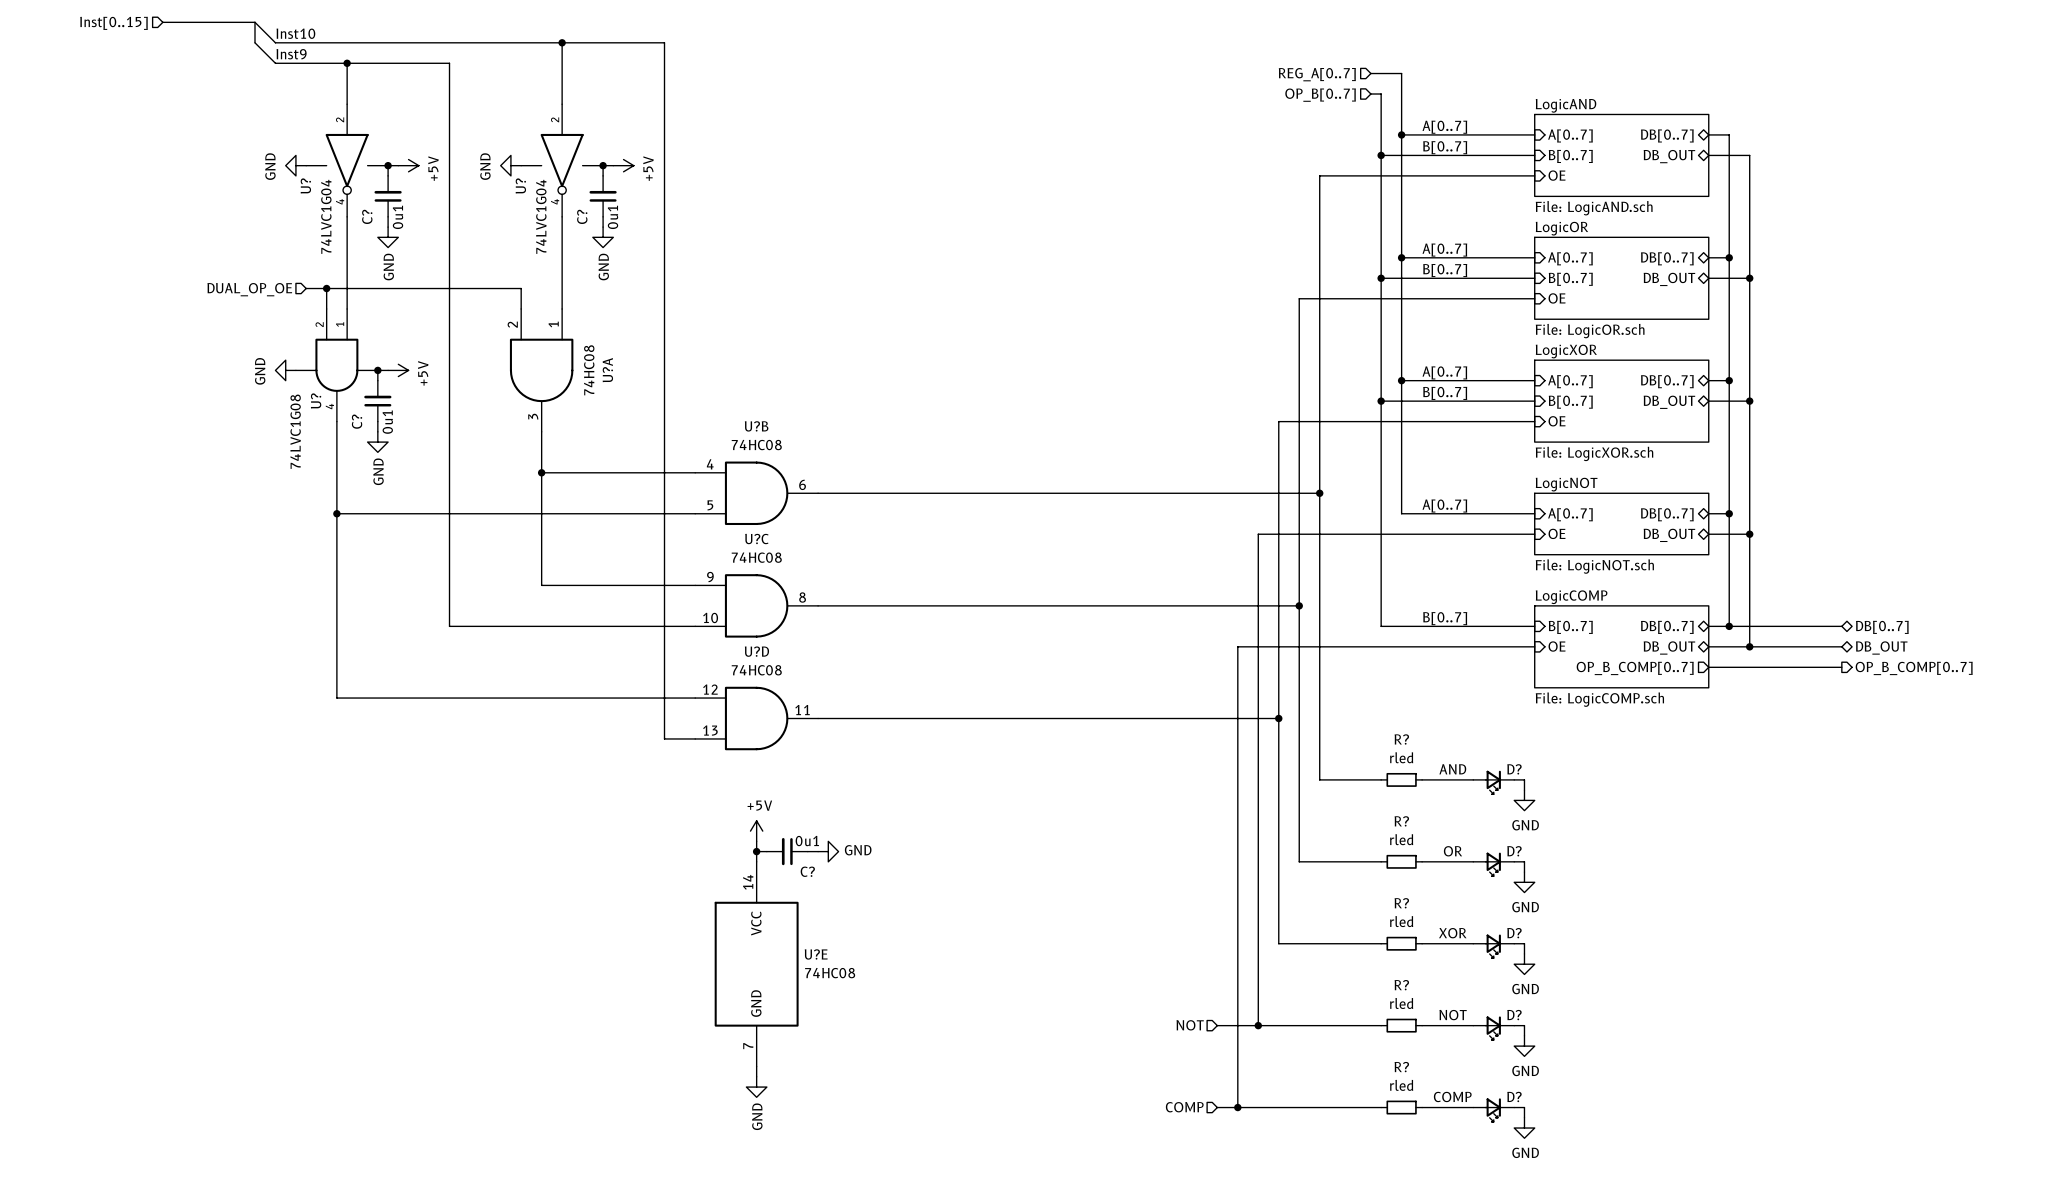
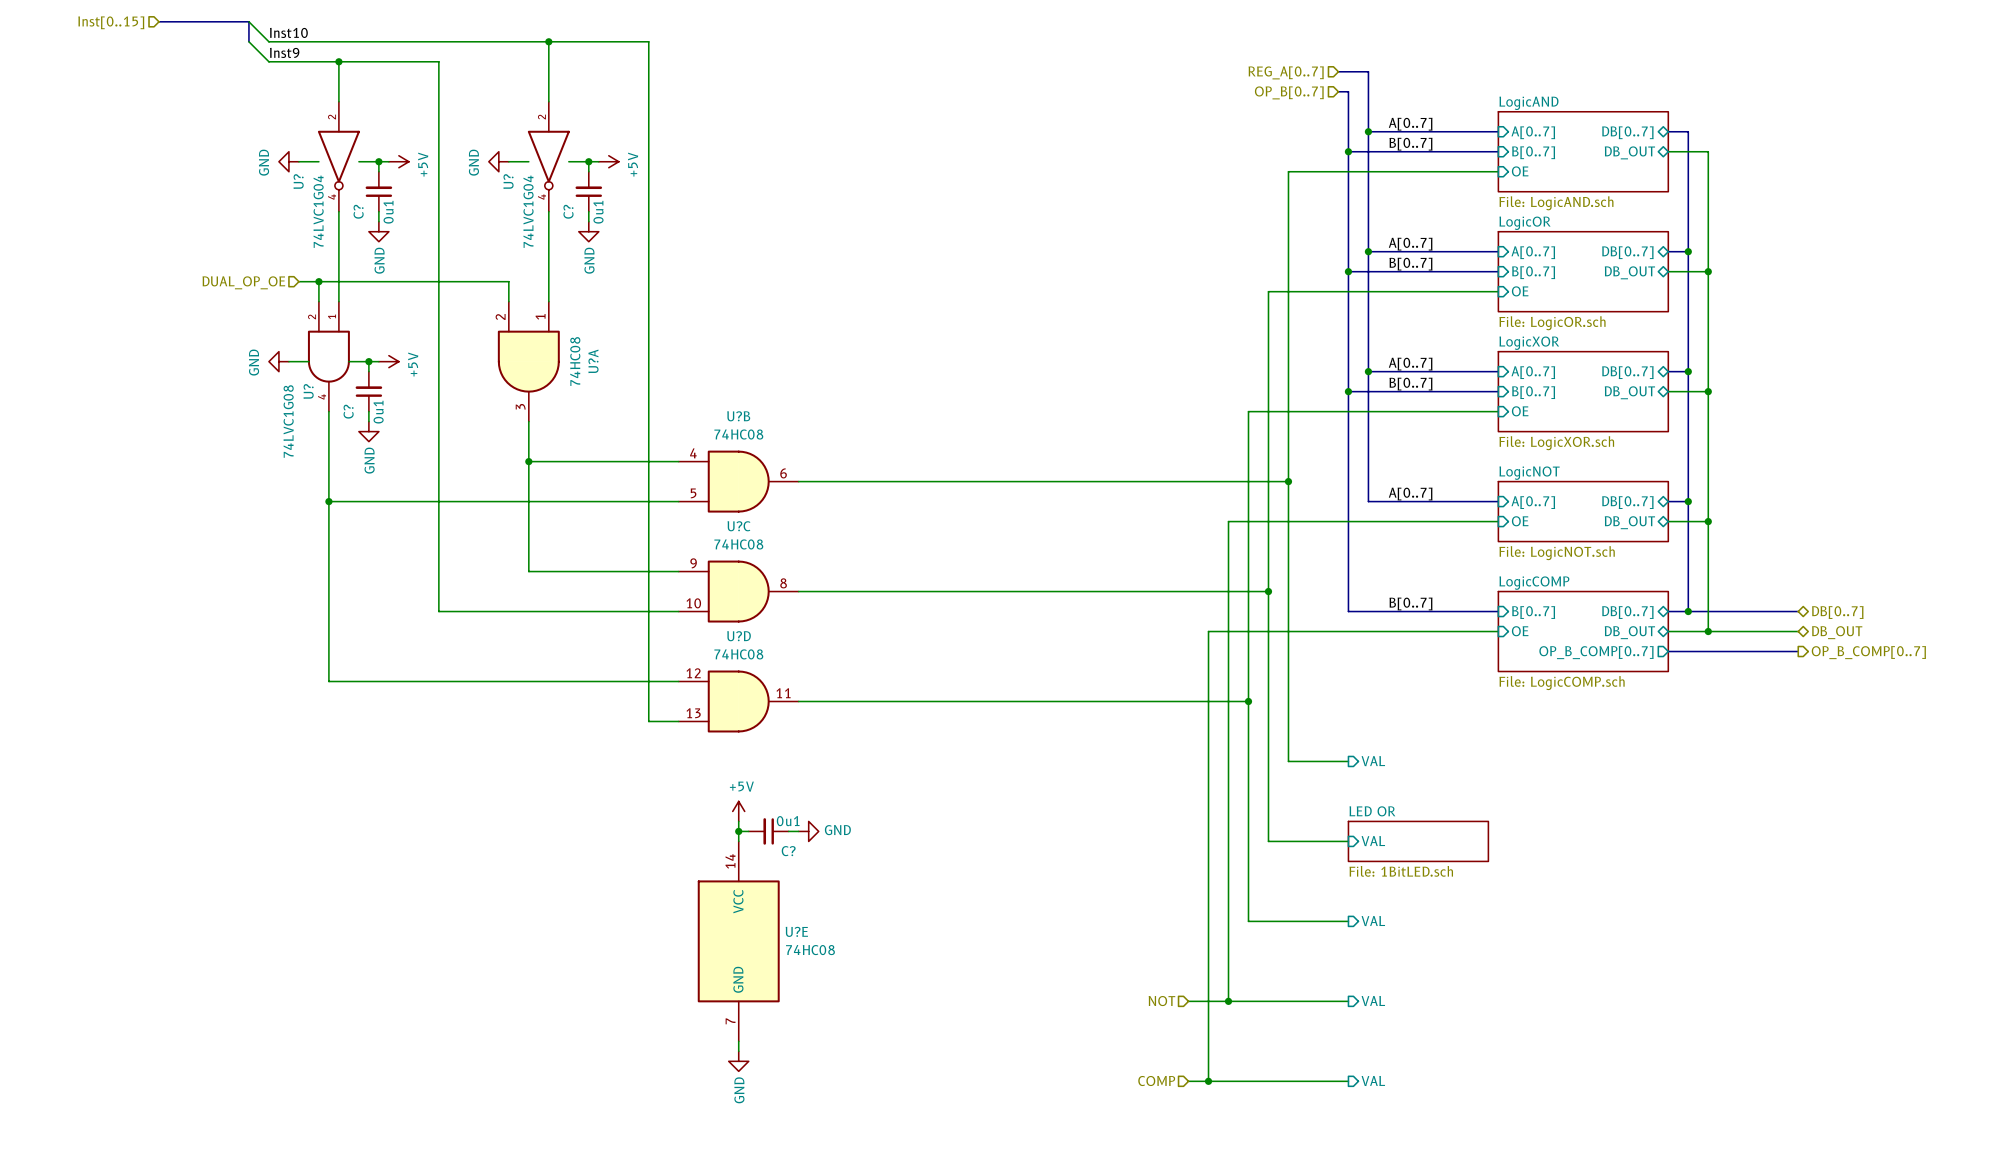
R?: rled (1401, 779) -> none
sheet pin: none -> VAL (1373, 761)
wire: (1422, 779) (1473, 779) -> none
wire: (1514, 779) (1524, 779) (1524, 790) -> none
D?: AND (1493, 782) -> none
power symbol: GND (1524, 800) -> none
R?: rled (1401, 861) -> none
sheet pin: none -> VAL (1373, 841)
wire: (1422, 861) (1473, 861) -> none
sheet LED OR: none -> File: 1BitLED.sch (1418, 841)
wire: (1514, 861) (1524, 861) (1524, 872) -> none
D?: OR (1493, 864) -> none
power symbol: GND (1524, 882) -> none
R?: rled (1401, 943) -> none
sheet pin: none -> VAL (1373, 921)
wire: (1422, 943) (1473, 943) -> none
wire: (1514, 943) (1524, 943) (1524, 953) -> none
D?: XOR (1493, 946) -> none
power symbol: GND (1524, 964) -> none
R?: rled (1401, 1025) -> none
sheet pin: none -> VAL (1373, 1001)
wire: (1422, 1025) (1473, 1025) -> none
wire: (1514, 1025) (1524, 1025) (1524, 1035) -> none
D?: NOT (1493, 1028) -> none
power symbol: GND (1524, 1046) -> none
R?: rled (1401, 1107) -> none
sheet pin: none -> VAL (1373, 1081)
wire: (1422, 1107) (1473, 1107) -> none
wire: (1514, 1107) (1524, 1107) (1524, 1117) -> none
D?: COMP (1493, 1110) -> none
power symbol: GND (1524, 1128) -> none

